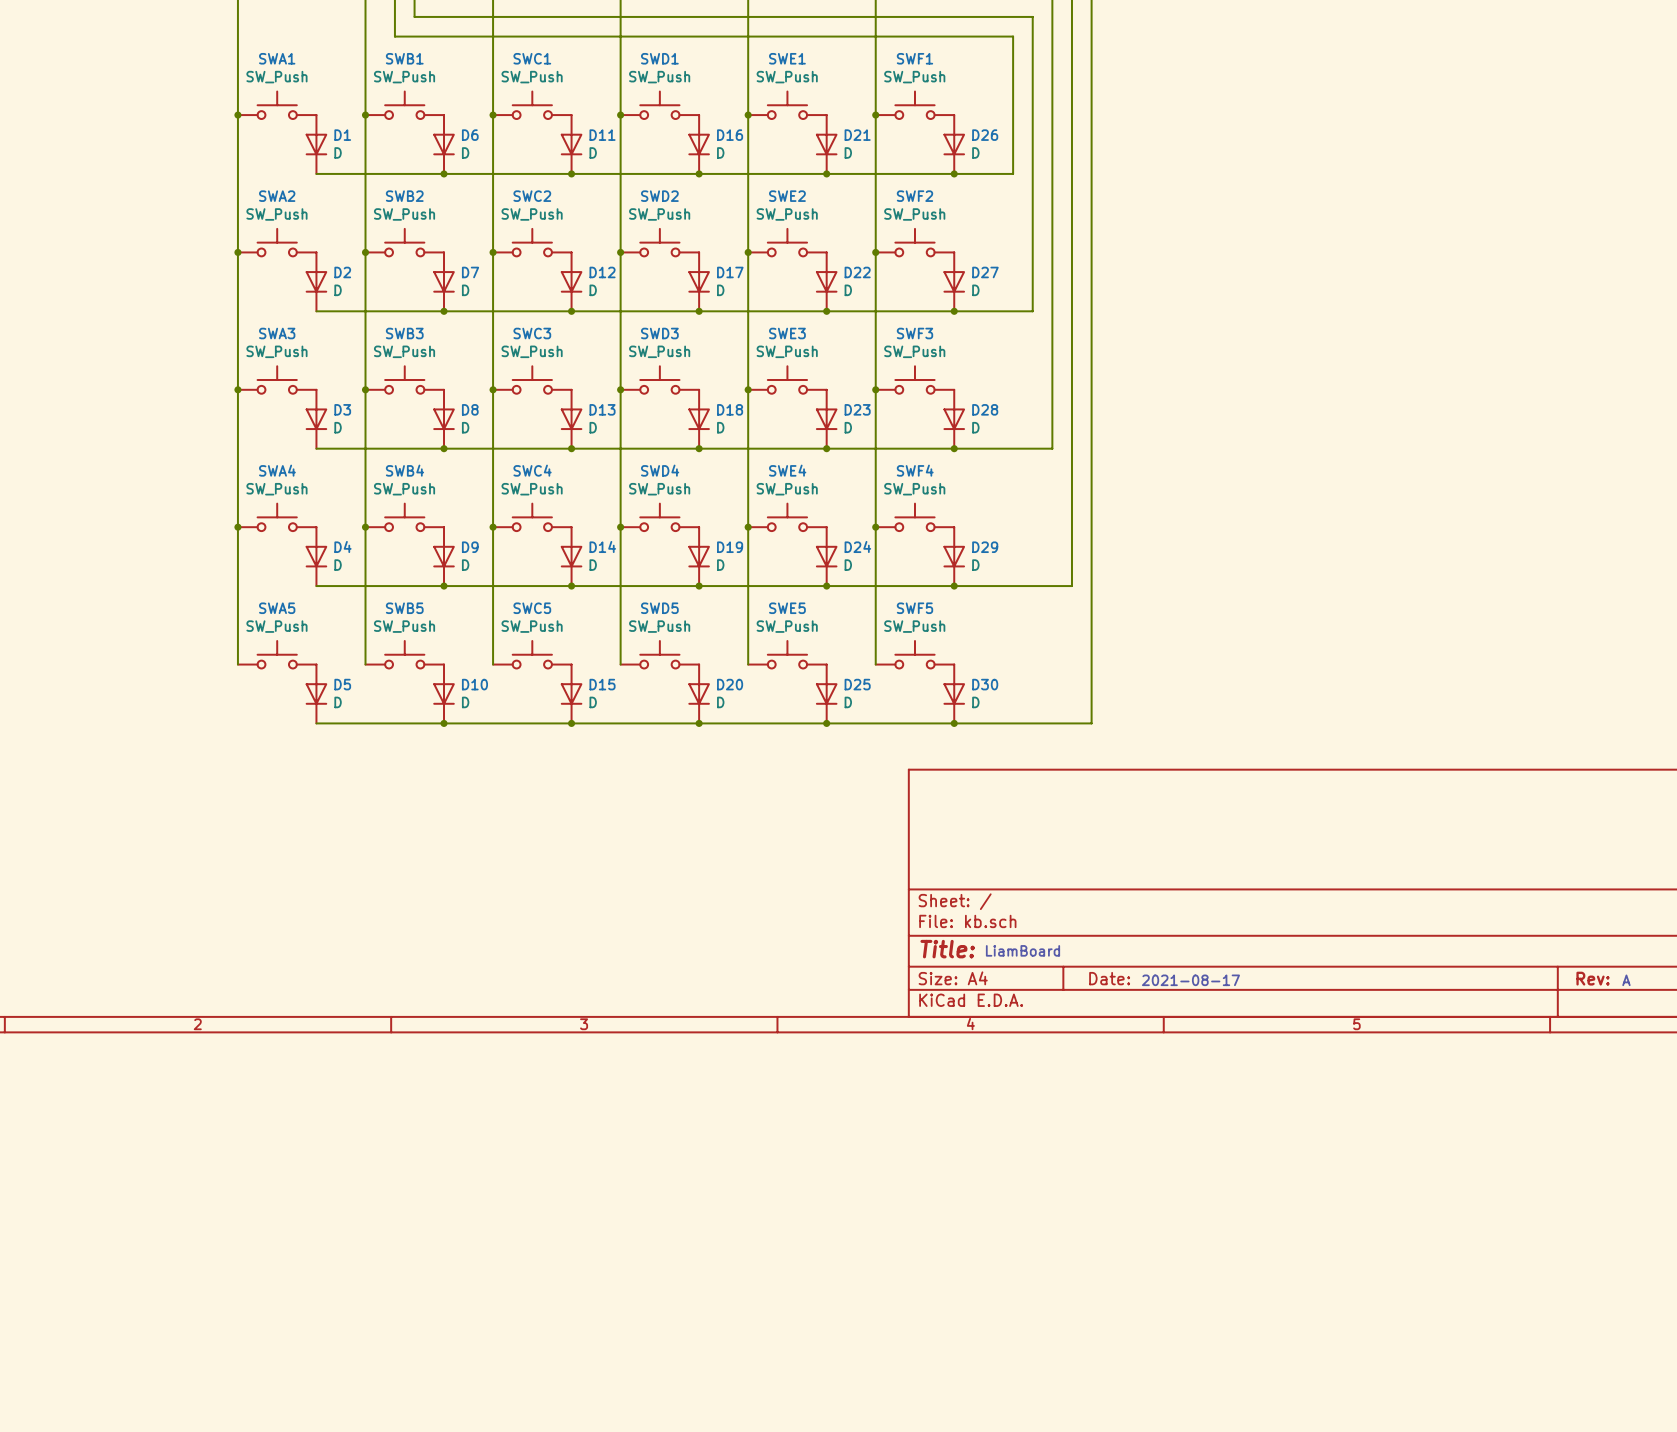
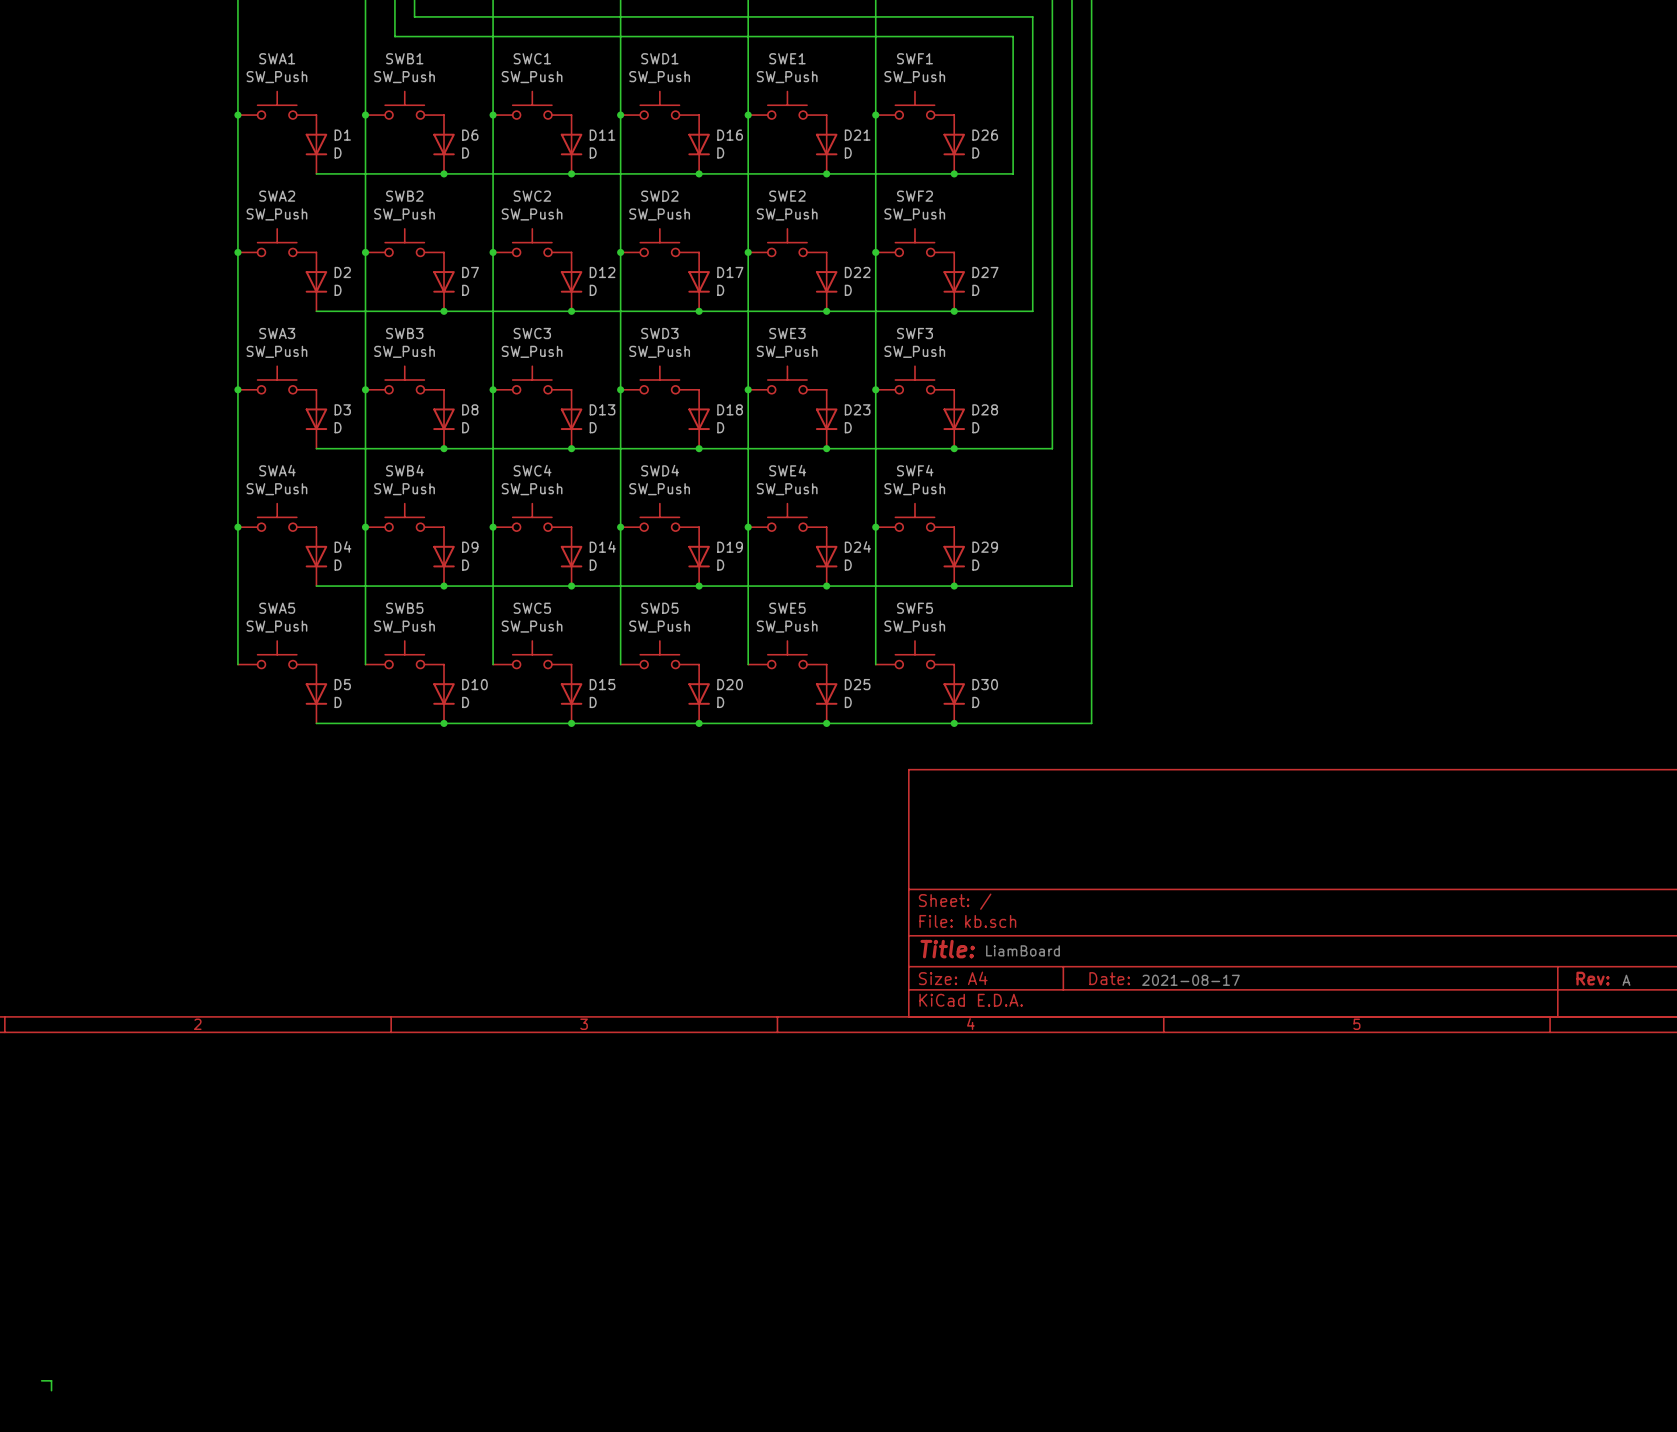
wire: none -> (41, 1380) (51, 1380) (51, 1390)

